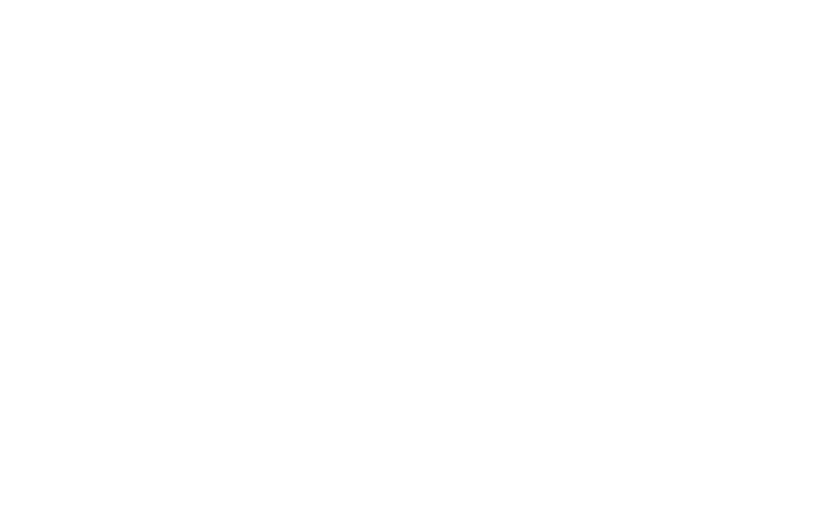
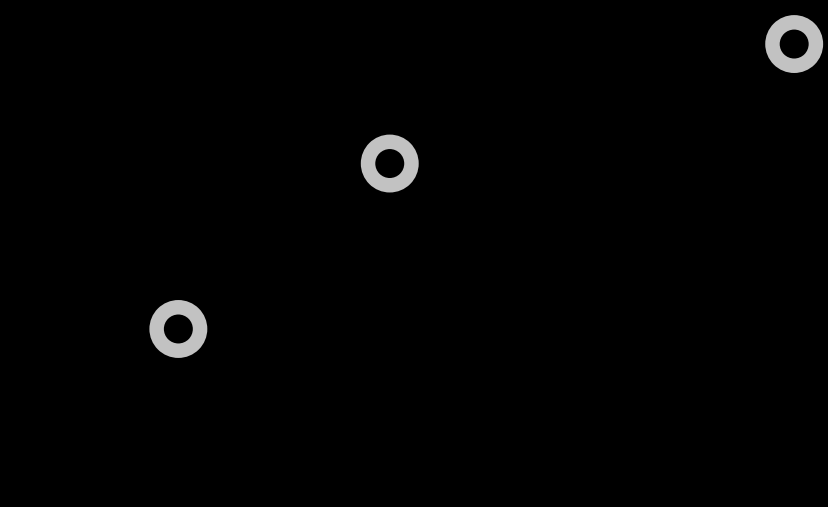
via: none -> (794, 44)
via: none -> (389, 163)
via: none -> (178, 328)

